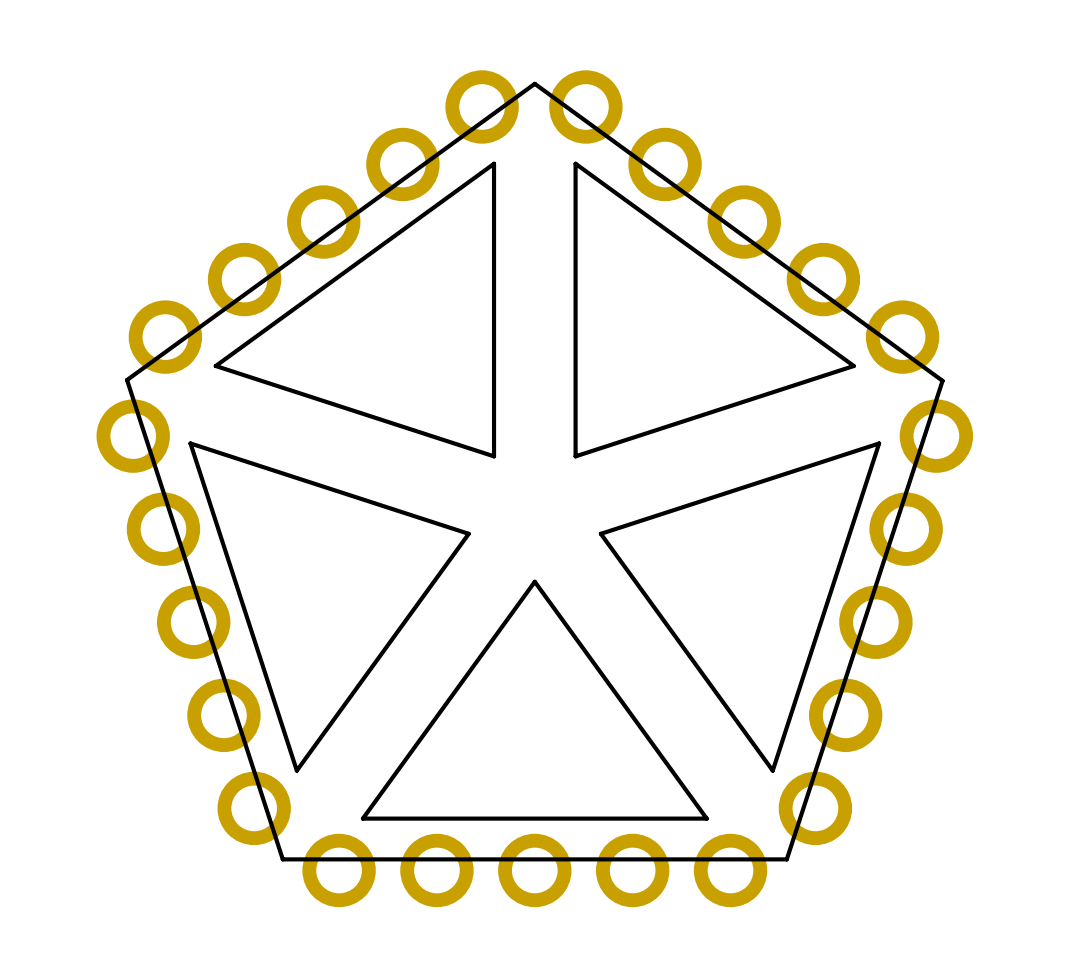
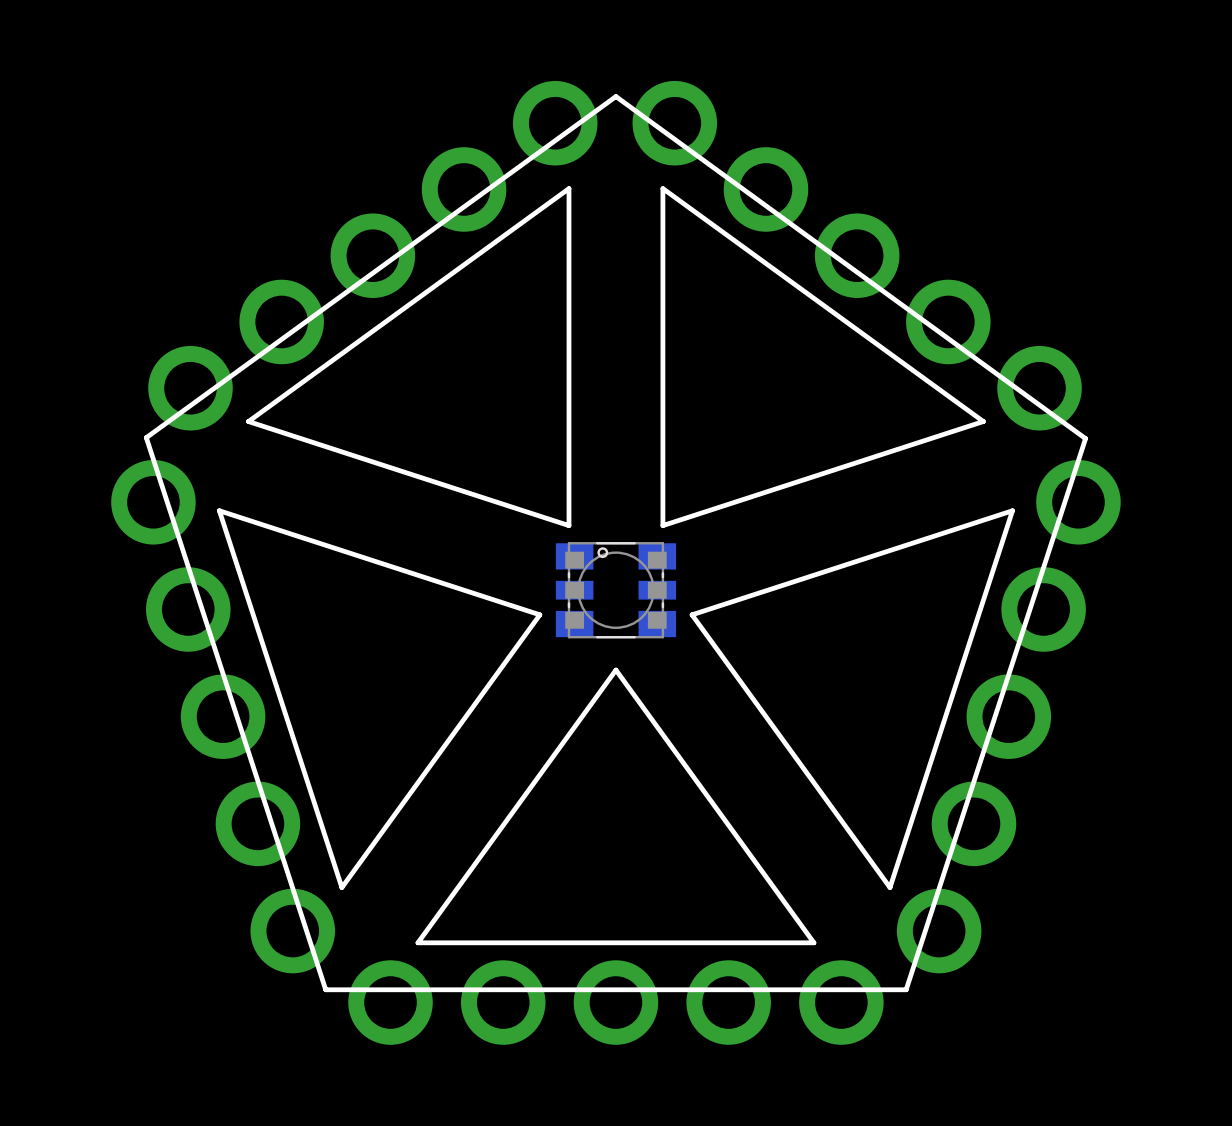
part: none -> (615, 590)

